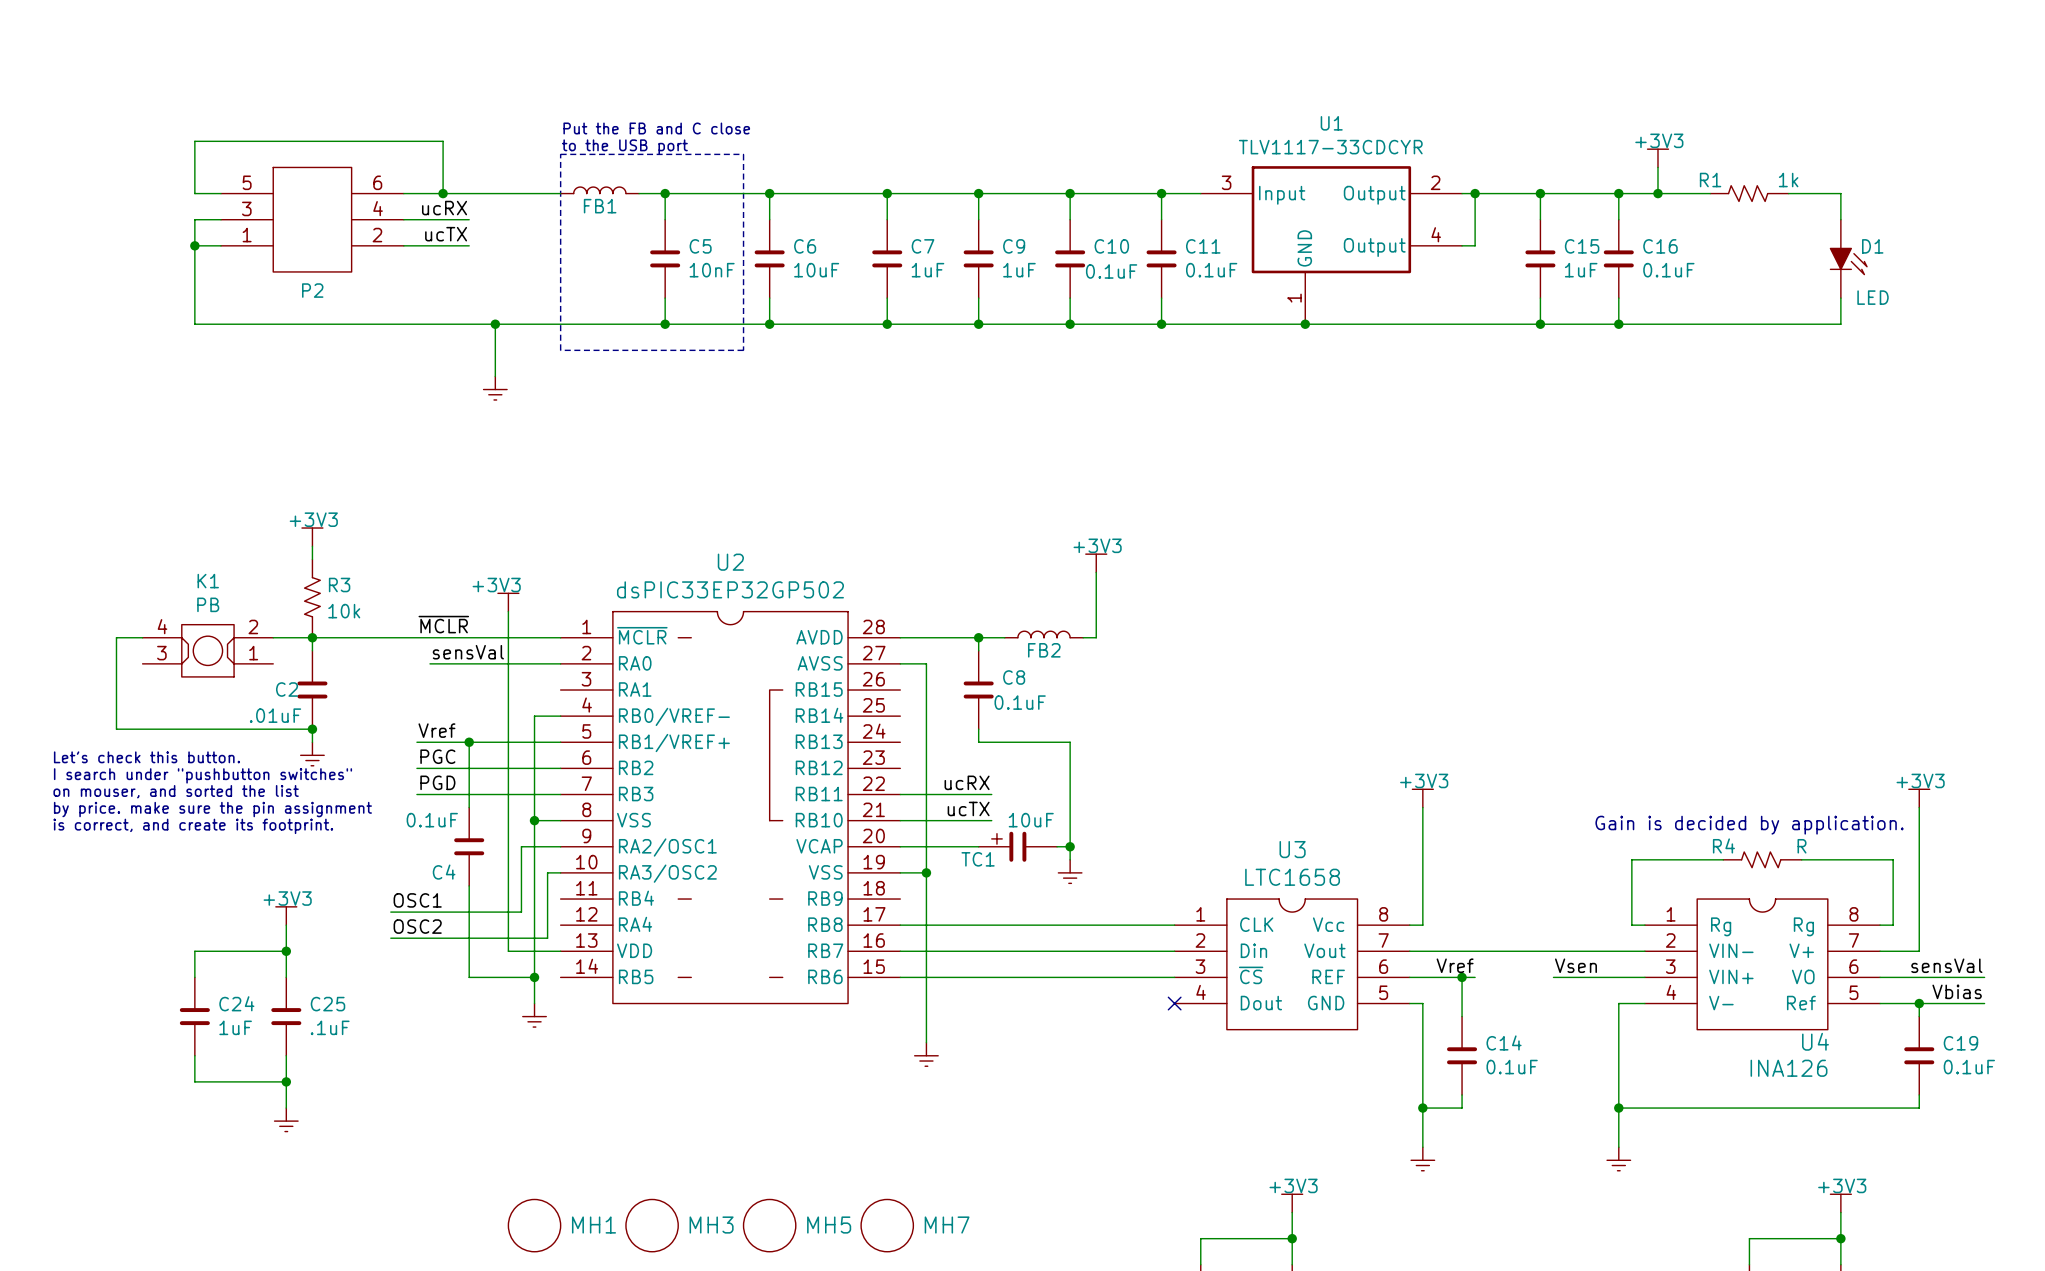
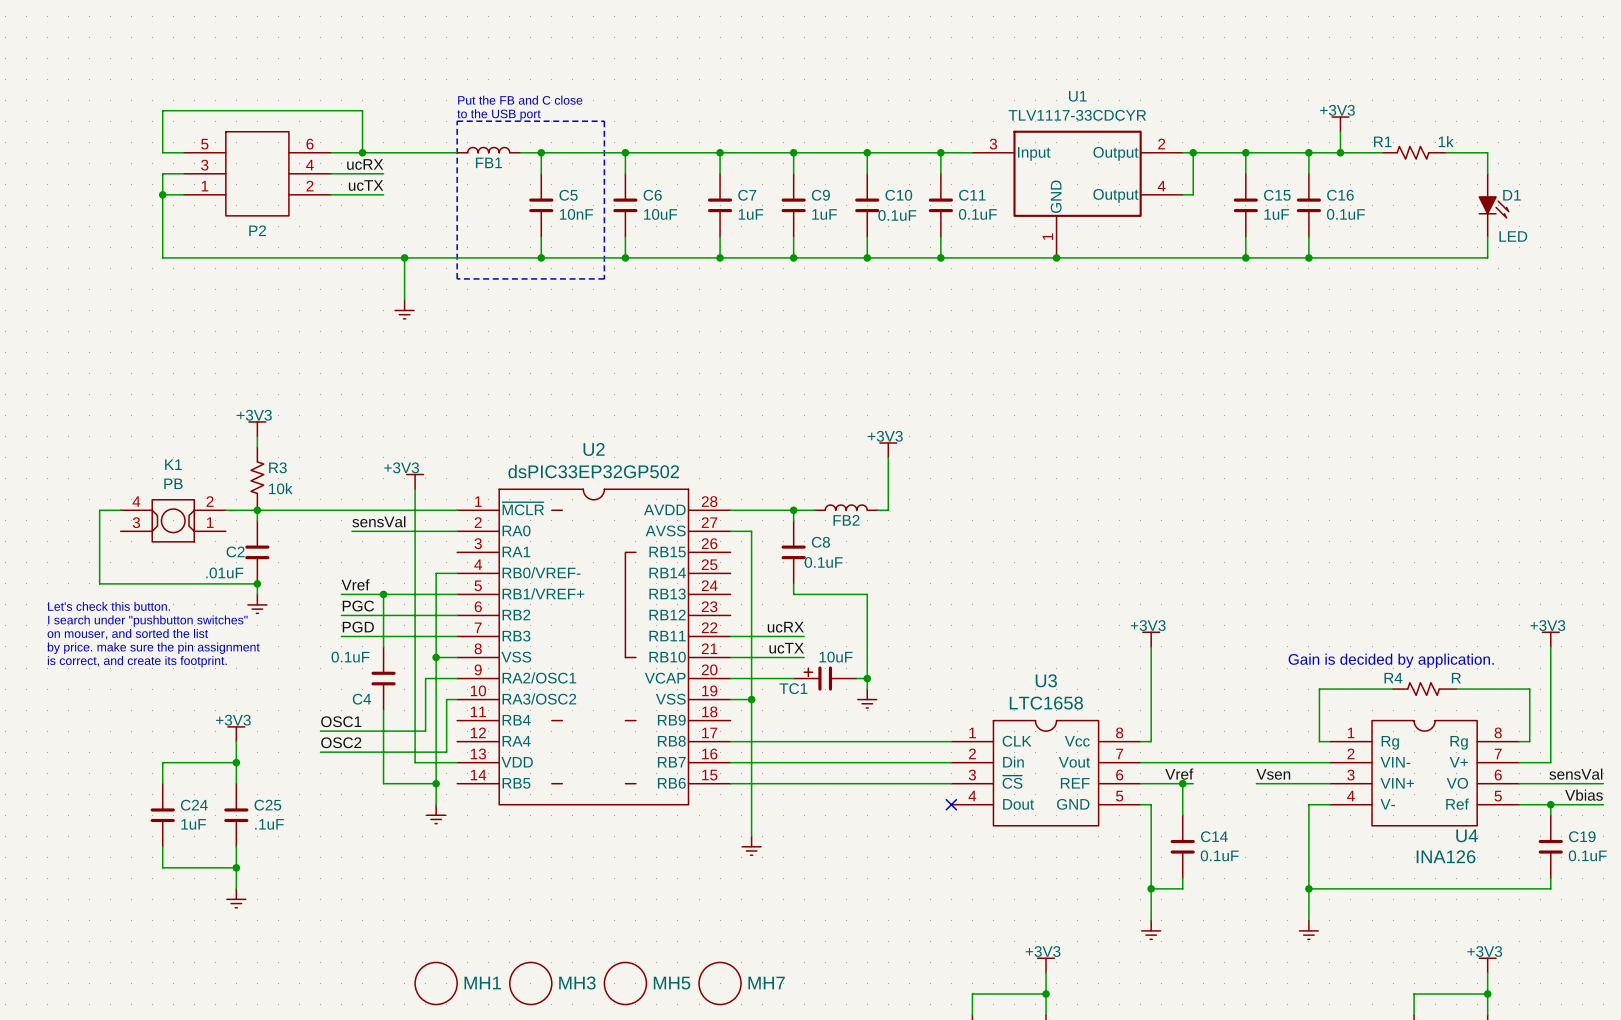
label: ~{MCLR} (443, 624) -> none

